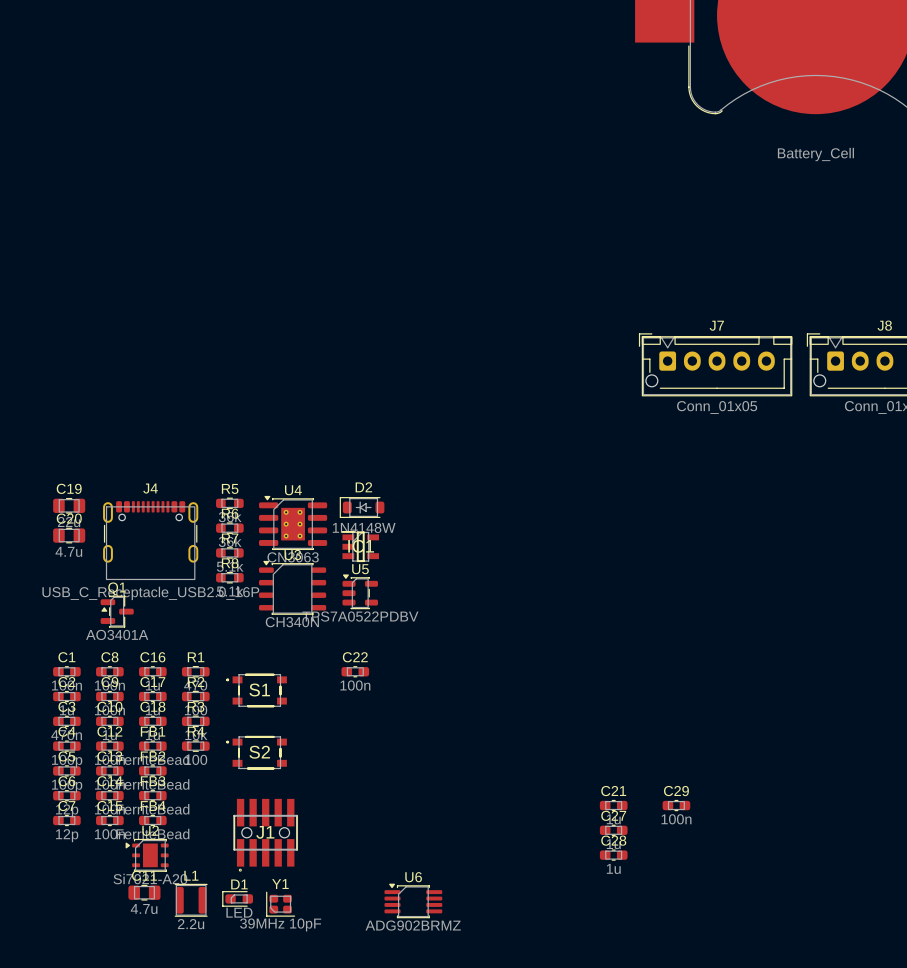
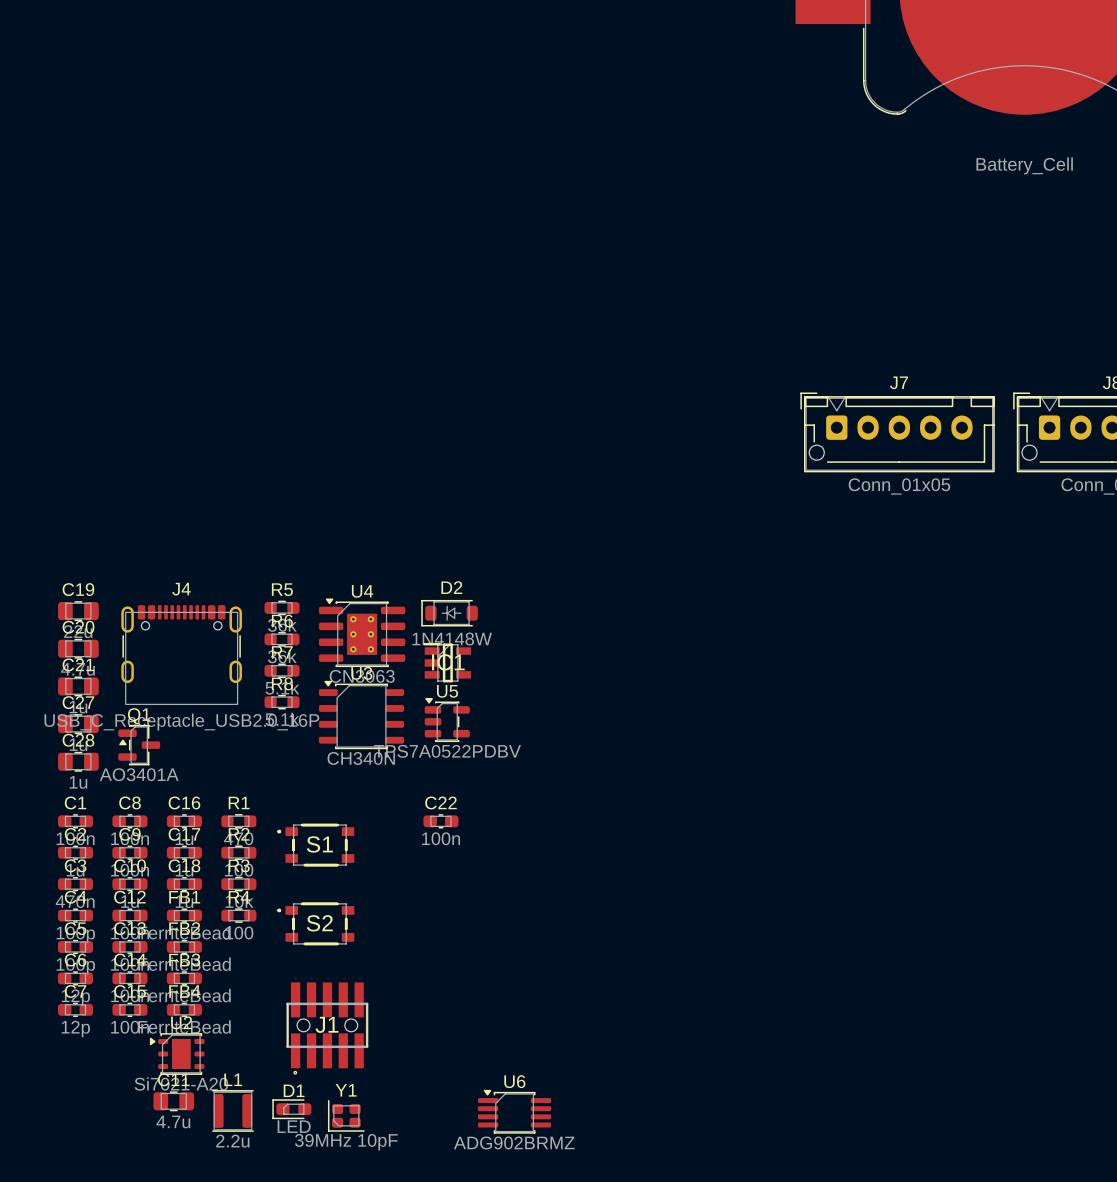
C21 footprint: [599, 799, 628, 812] -> [58, 676, 99, 697]
C29: 100n (676, 805) -> none
C27 footprint: [599, 824, 628, 836] -> [58, 714, 99, 735]
C28 footprint: [599, 849, 628, 861] -> [58, 751, 99, 772]

